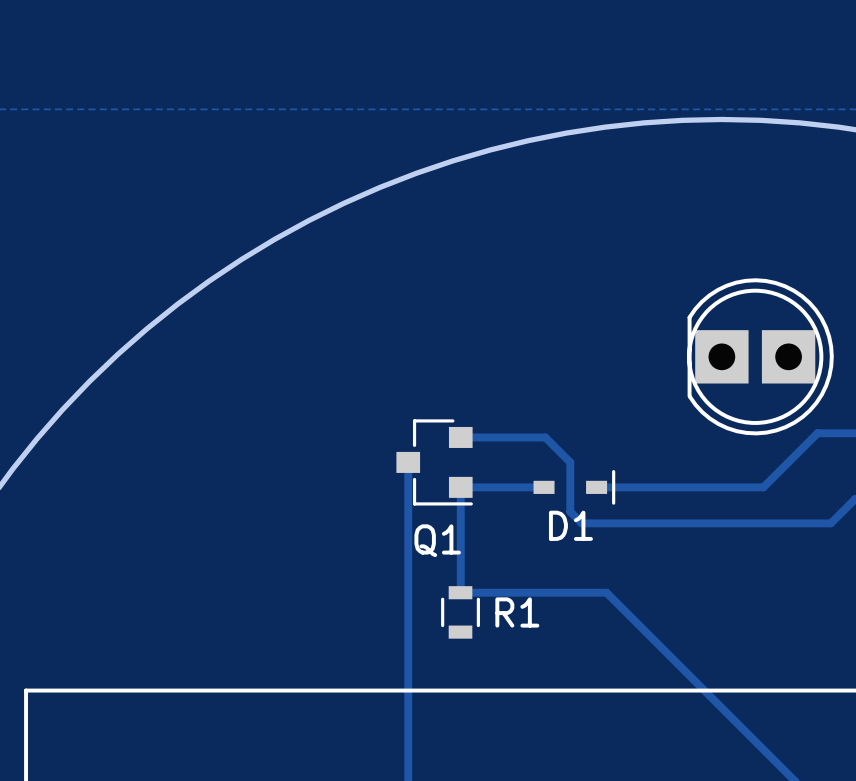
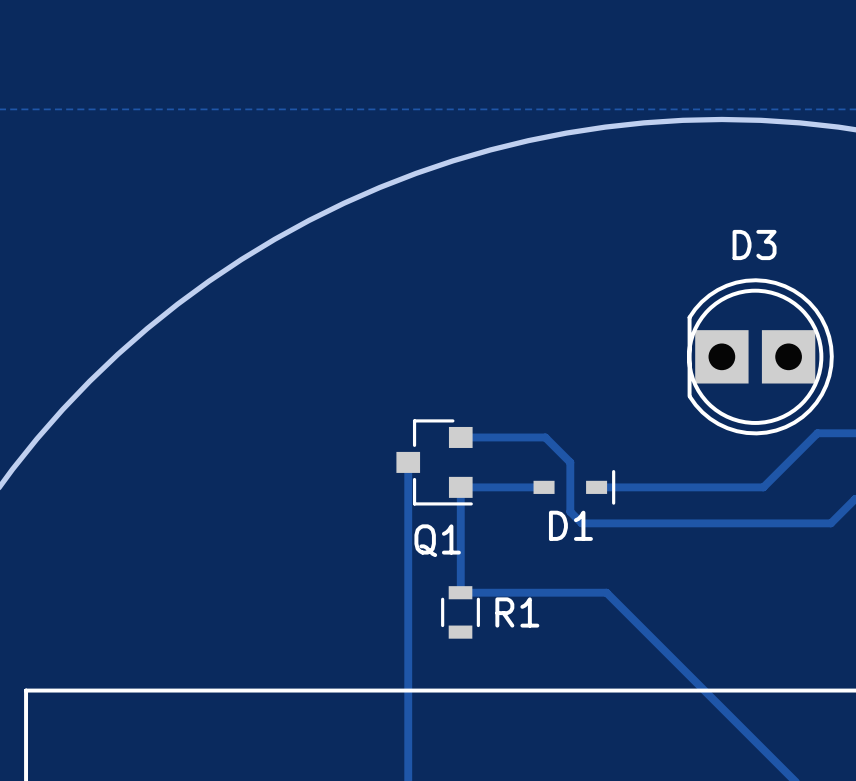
D3 name: none -> D3 (754, 244)

